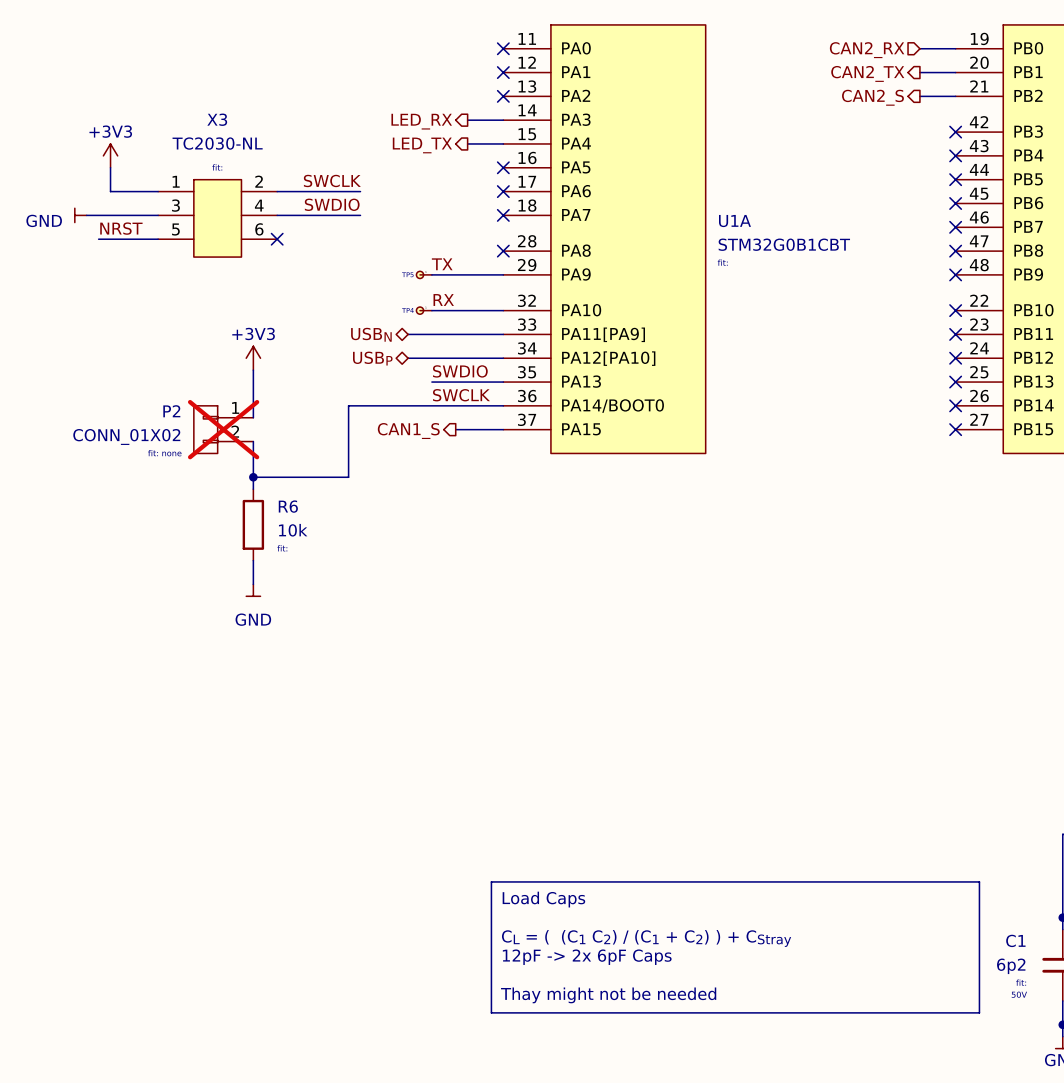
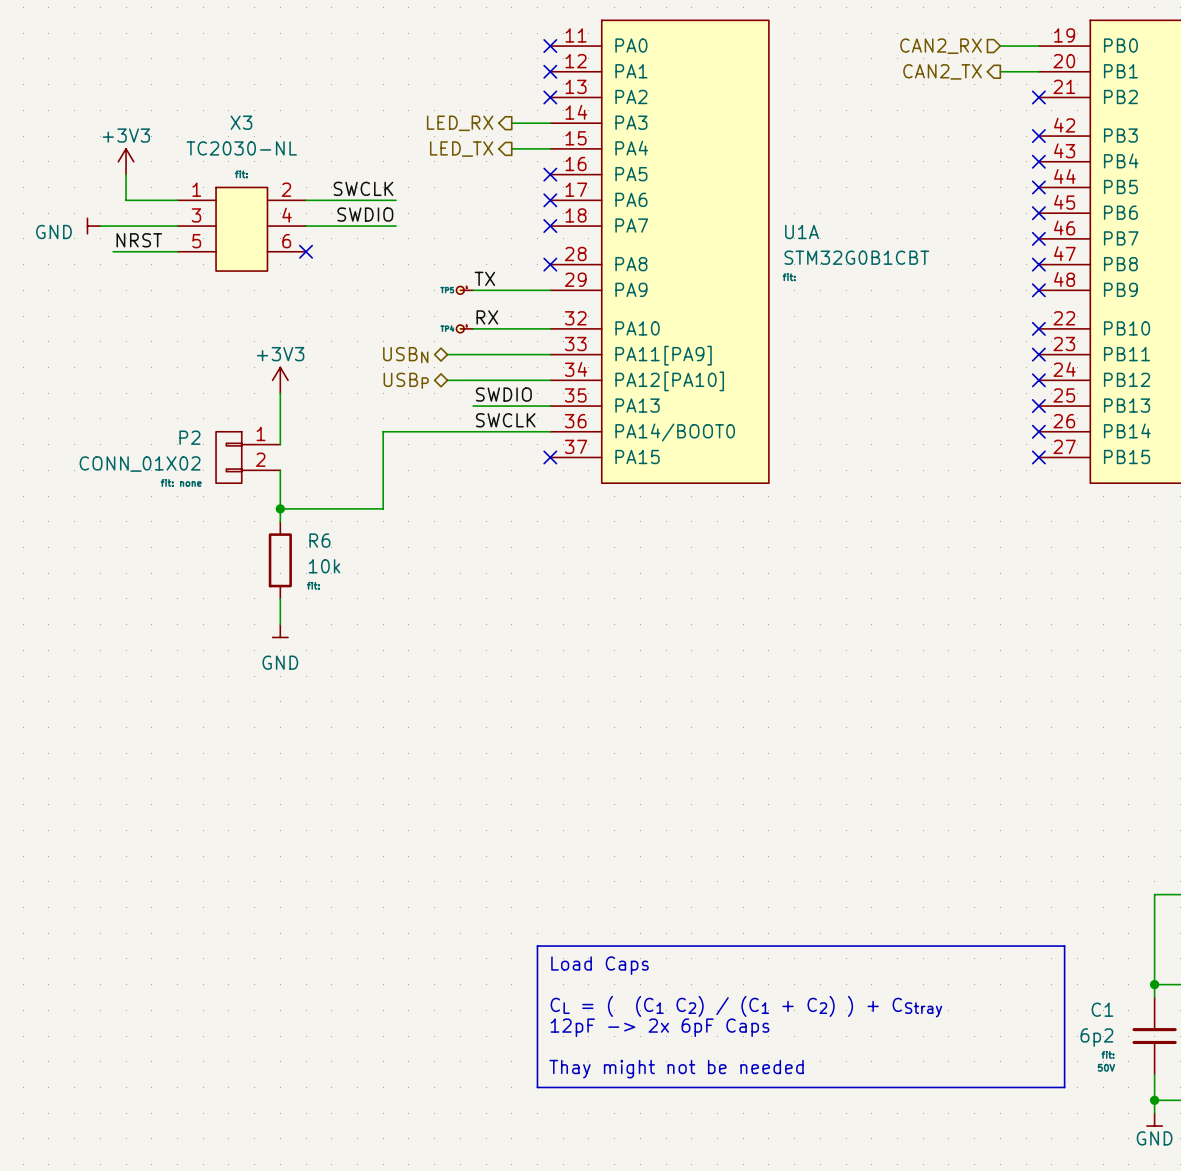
wire: (919, 96) (955, 96) -> none
no-connect mark: none -> (1038, 97)
hierarchical label: CAN2_S (872, 97) -> none
P2 do-not-place cross: (223, 429) -> none
wire: (455, 429) (503, 429) -> none
no-connect mark: none -> (550, 457)
hierarchical label: CAN1_S (408, 431) -> none

